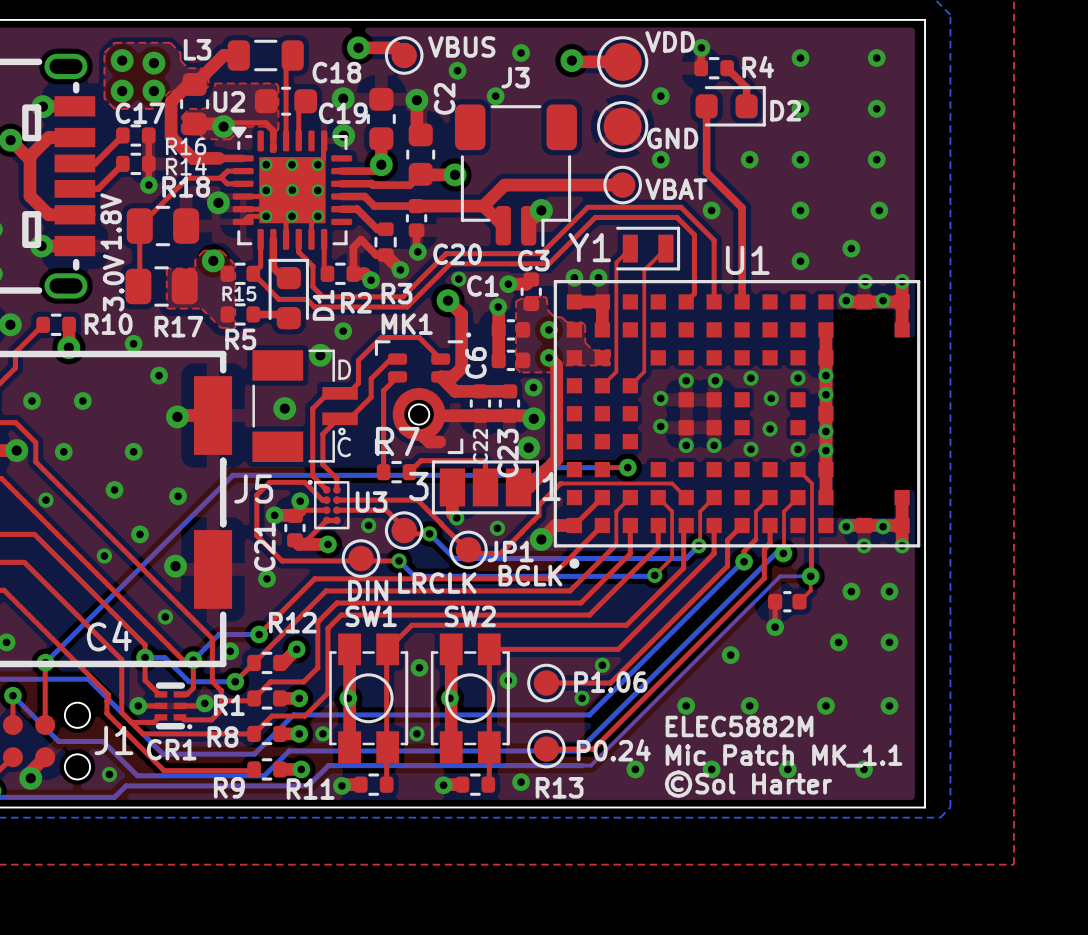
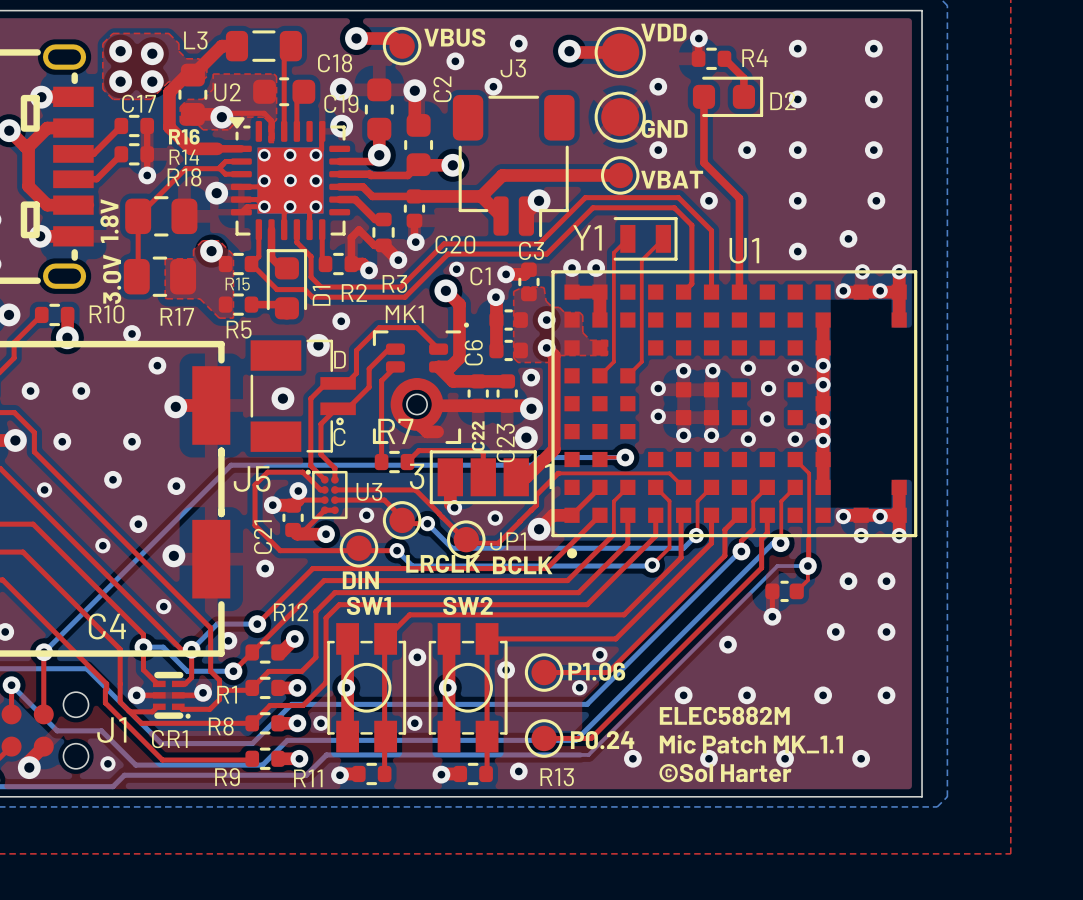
text position: LRCLK (437, 583) -> LRCLK (443, 563)

